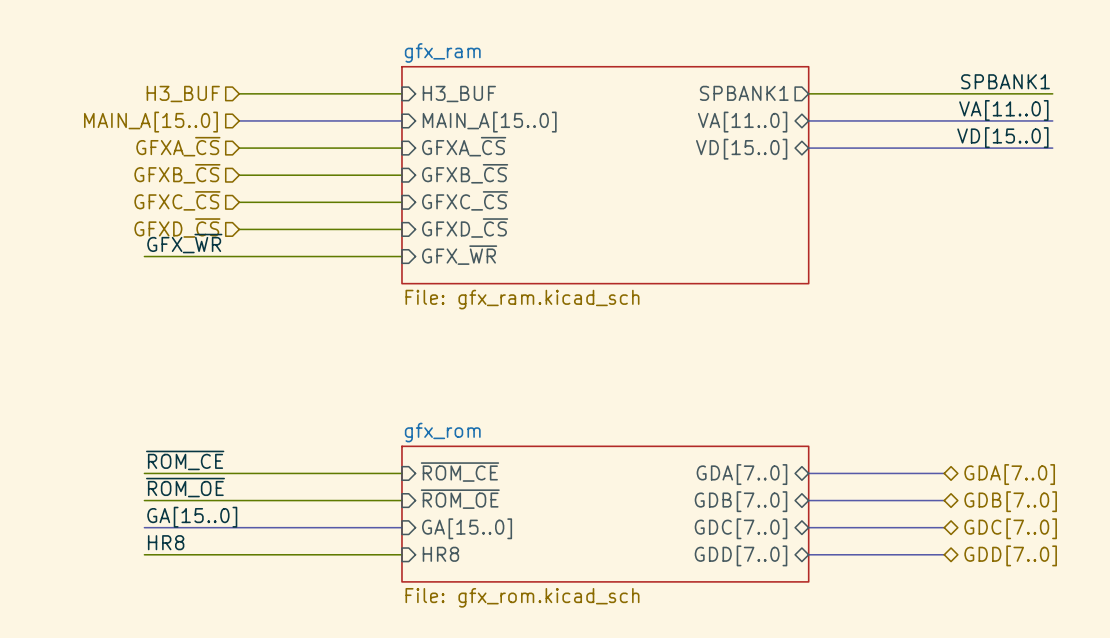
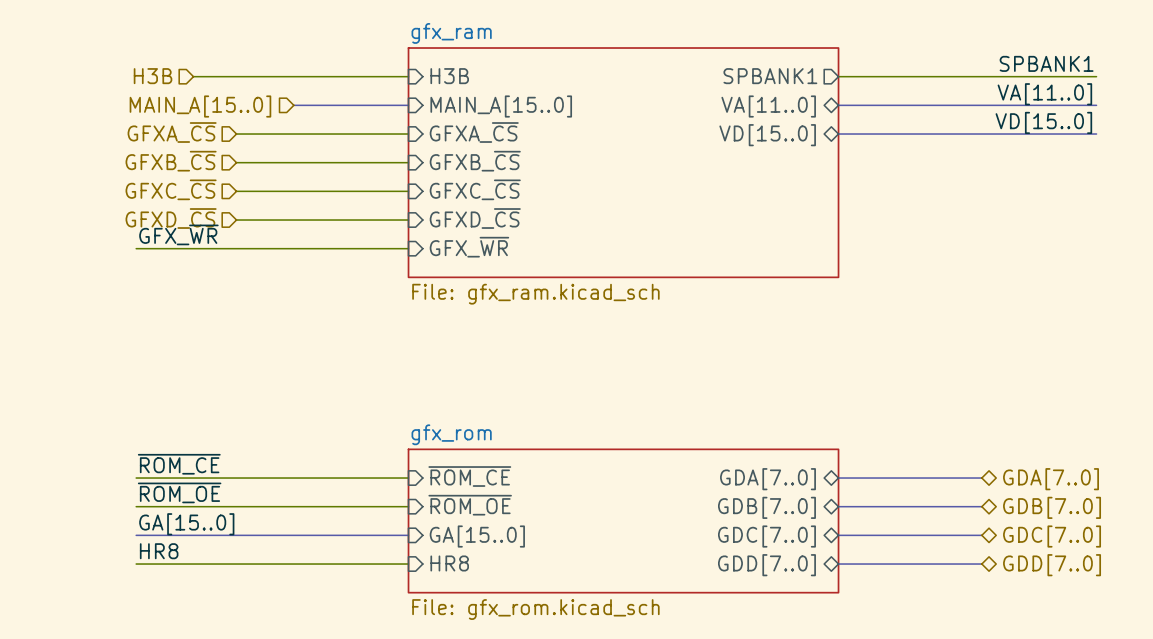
hierarchical label: H3_BUF (183, 93) -> H3B (153, 76)
wire: none -> (193, 76) (236, 76)
sheet pin: H3_BUF (459, 93) -> H3B (449, 76)
bus: (239, 120) (293, 120) -> none
hierarchical label position: MAIN_A[15..0] (150, 122) -> MAIN_A[15..0] (200, 106)

